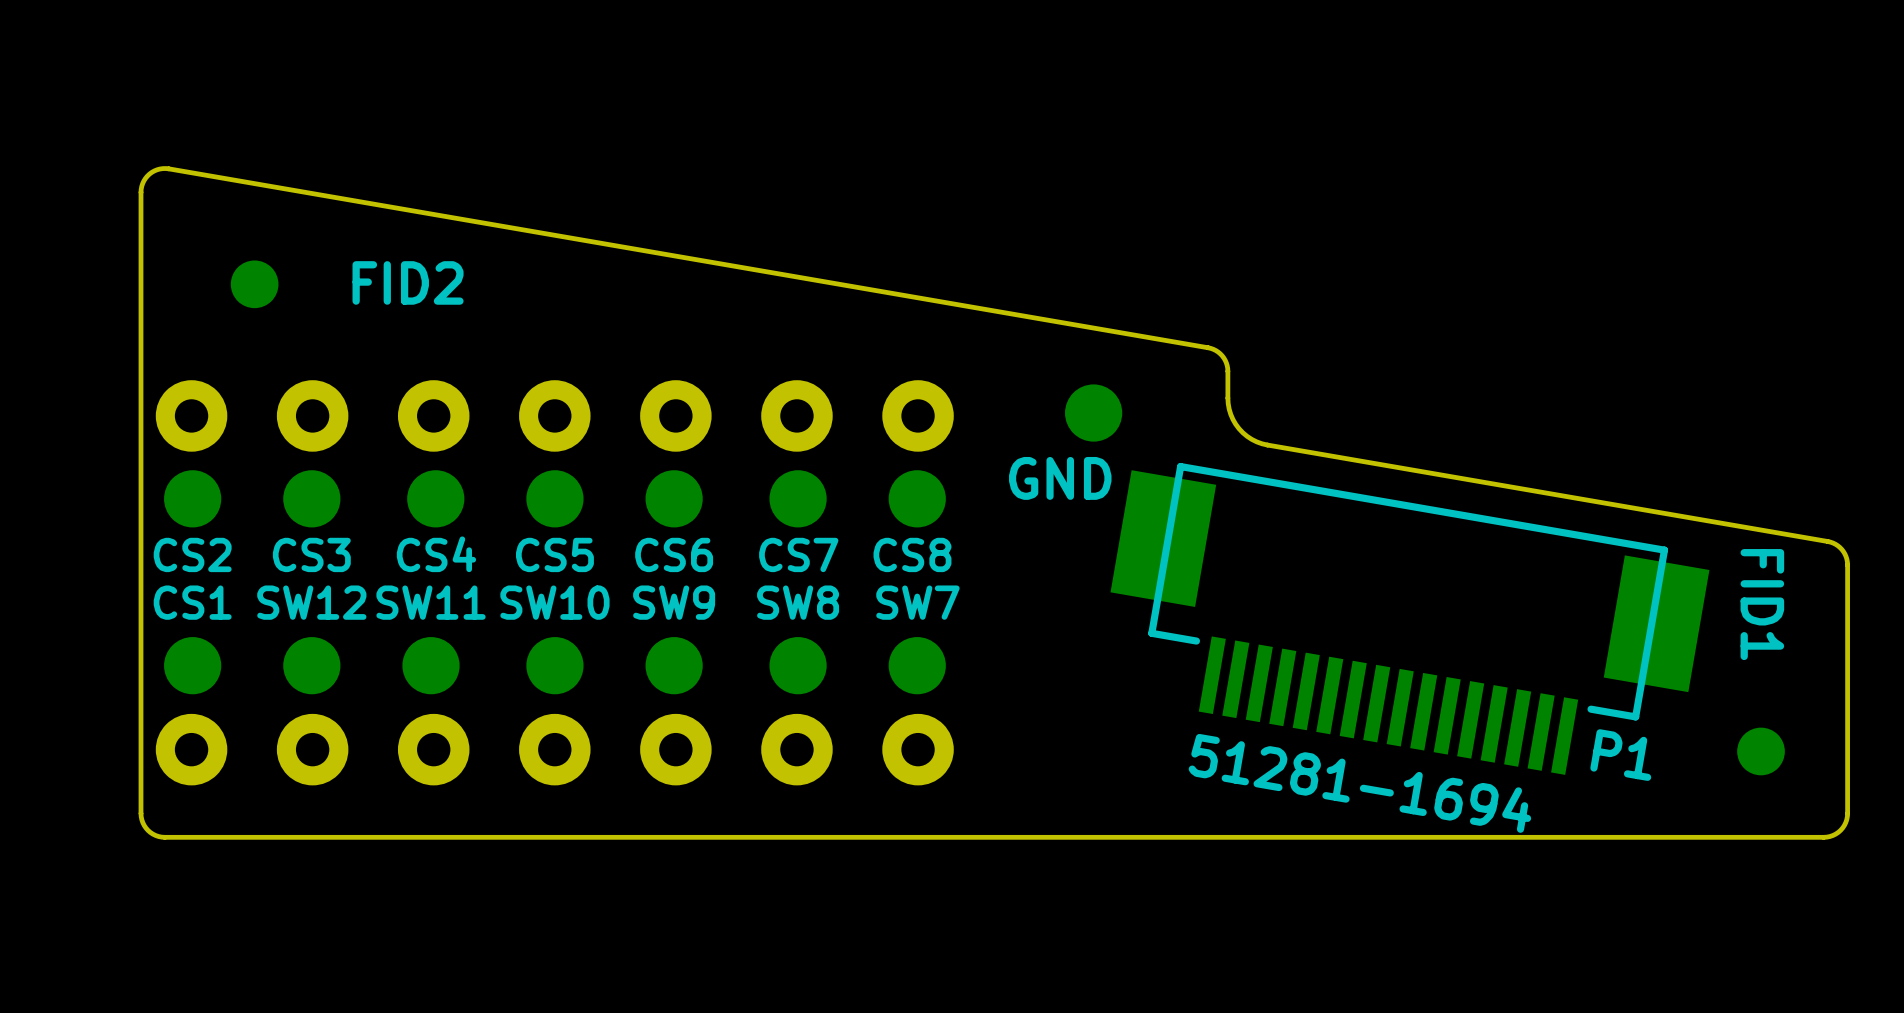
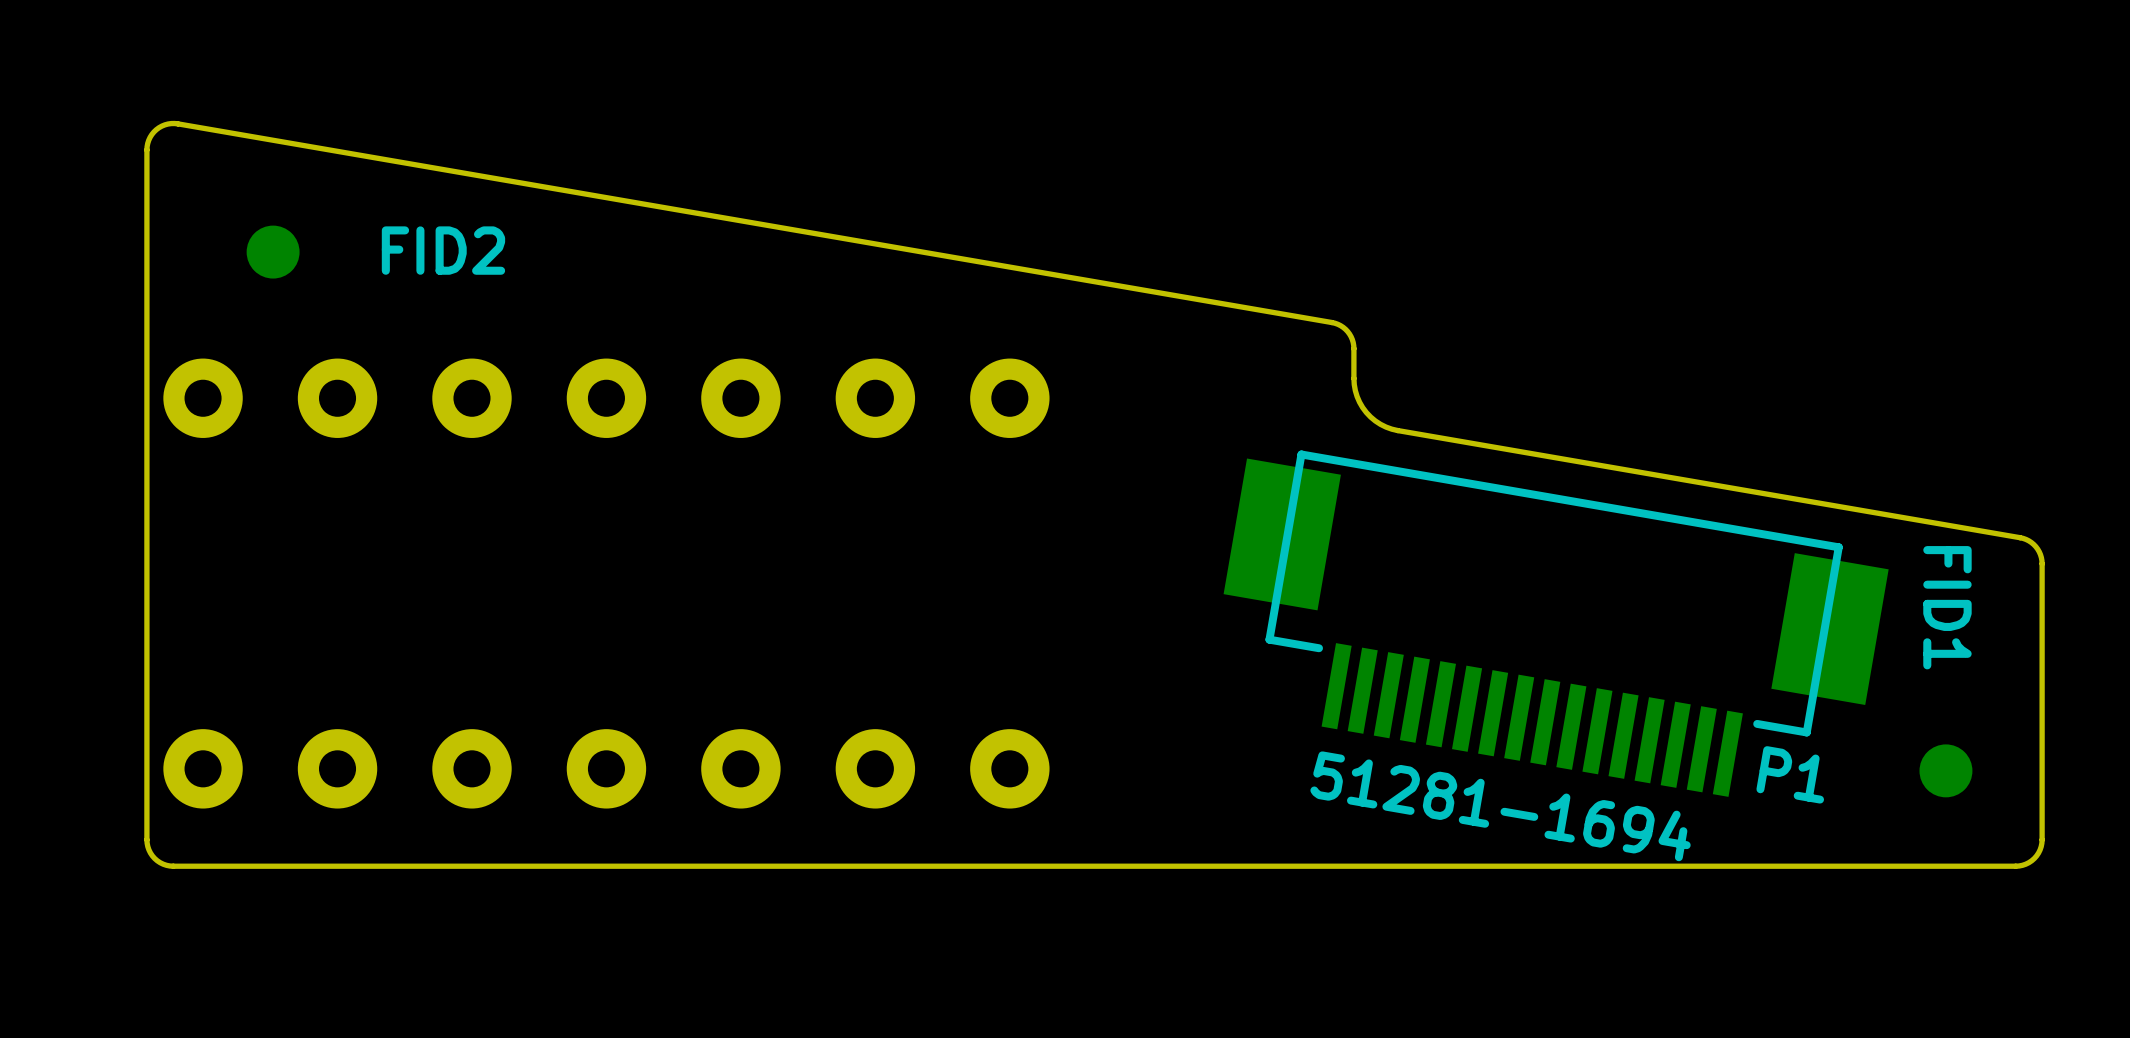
part: GND (1093, 413) -> none
part: CS2 (192, 498) -> none
part: CS3 (311, 498) -> none
part: CS4 (435, 498) -> none
part: CS5 (554, 498) -> none
part: CS6 (674, 498) -> none
part: CS7 (798, 498) -> none
part: CS8 (917, 498) -> none
part: CS1 (192, 665) -> none
part: SW12 (311, 665) -> none
part: SW11 (431, 665) -> none
part: SW10 (554, 665) -> none
part: SW9 (674, 665) -> none
part: SW8 (798, 665) -> none
part: SW7 (917, 665) -> none

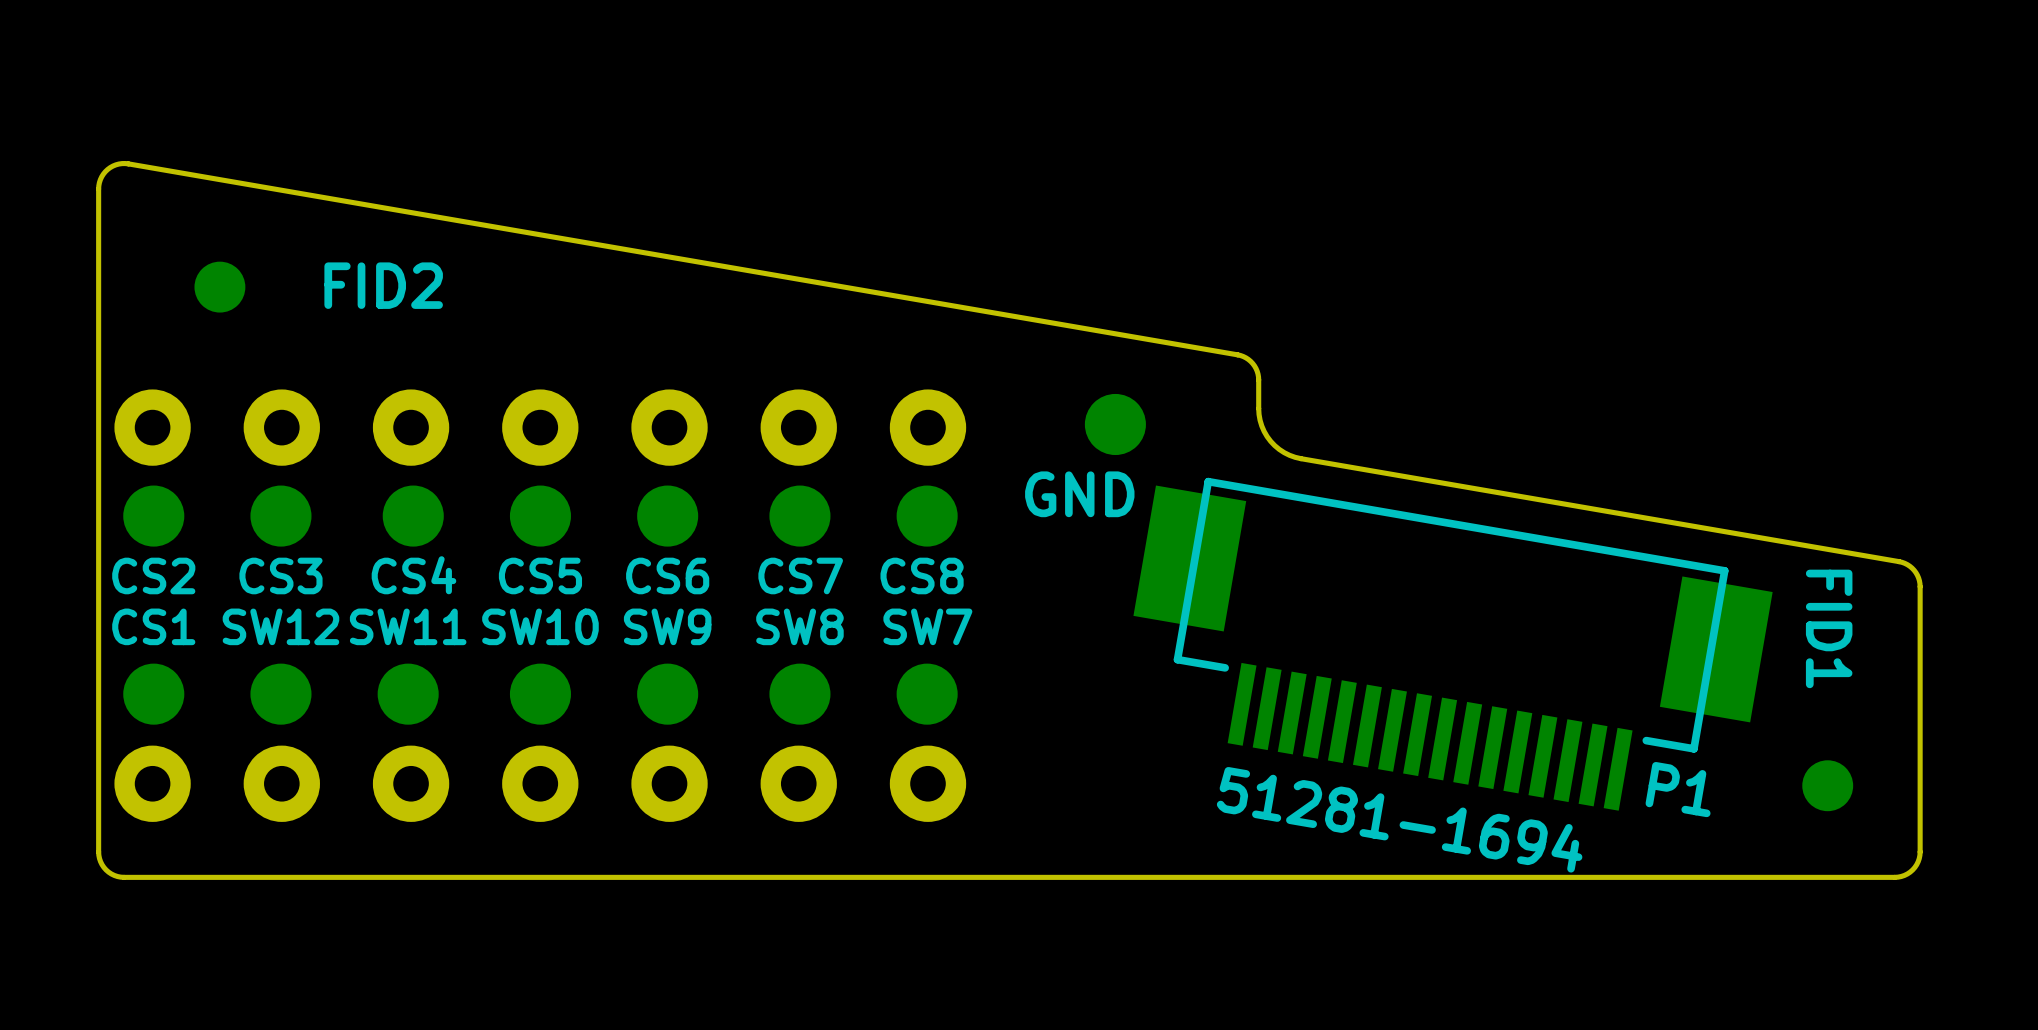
part: none -> GND (1115, 424)
part: none -> CS2 (153, 516)
part: none -> CS3 (280, 516)
part: none -> CS4 (413, 516)
part: none -> CS5 (540, 516)
part: none -> CS6 (667, 516)
part: none -> CS7 (799, 516)
part: none -> CS8 (927, 516)
part: none -> CS1 (153, 694)
part: none -> SW12 (280, 694)
part: none -> SW11 (408, 694)
part: none -> SW10 (540, 694)
part: none -> SW9 (667, 694)
part: none -> SW8 (799, 694)
part: none -> SW7 (927, 694)

